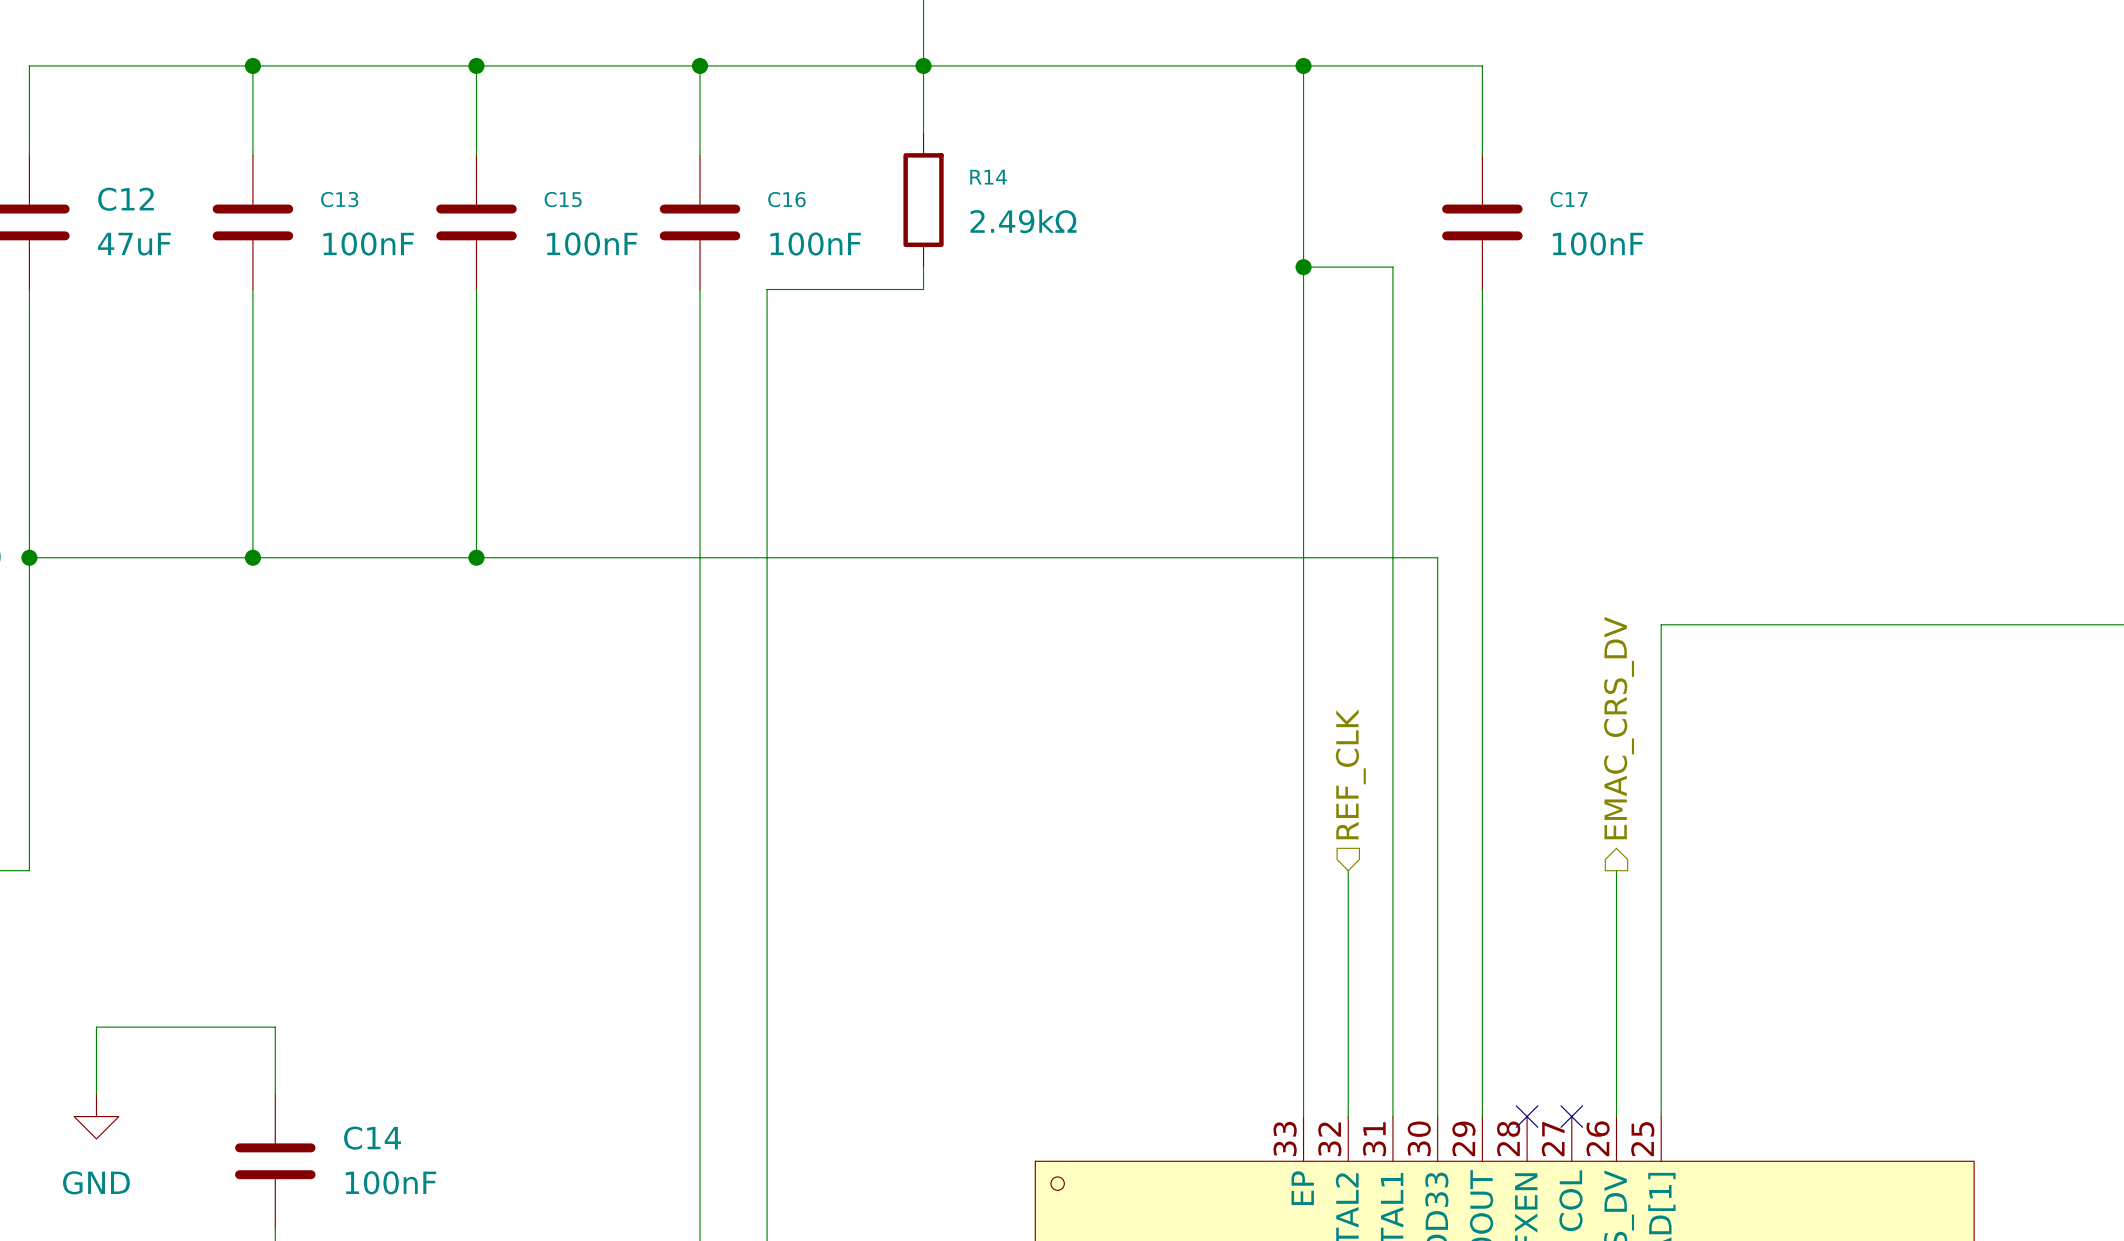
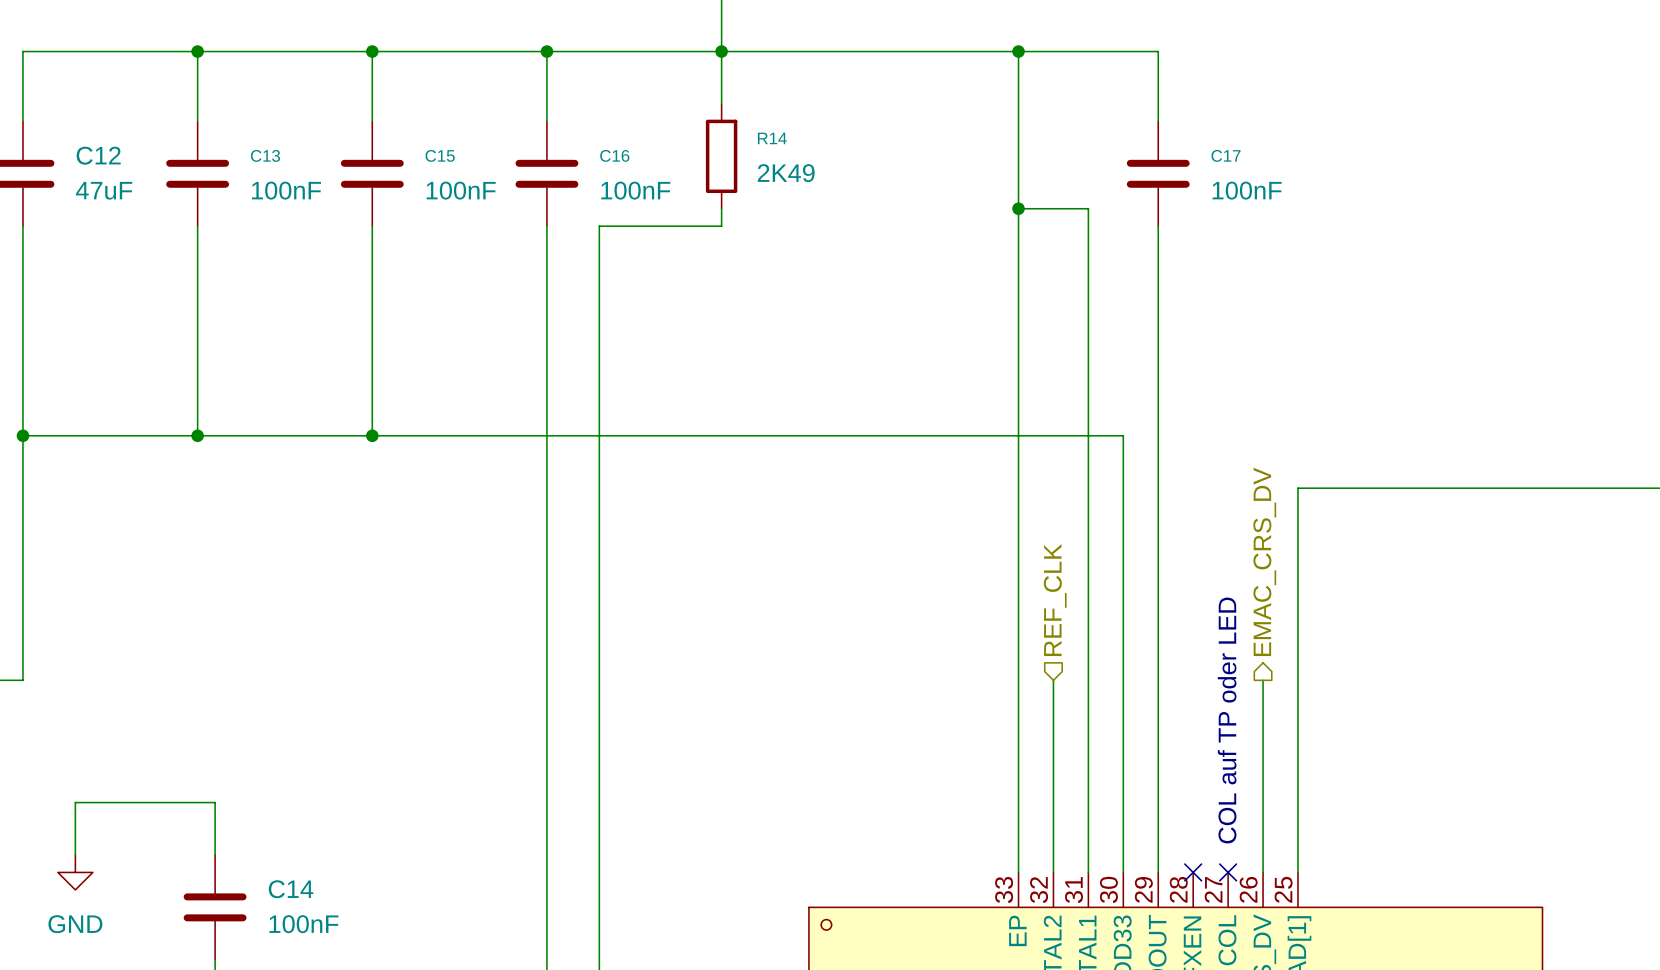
R14 value: 2.49kΩ (1023, 221) -> 2K49 (786, 173)
text: none -> COL auf TP oder LED (1227, 720)

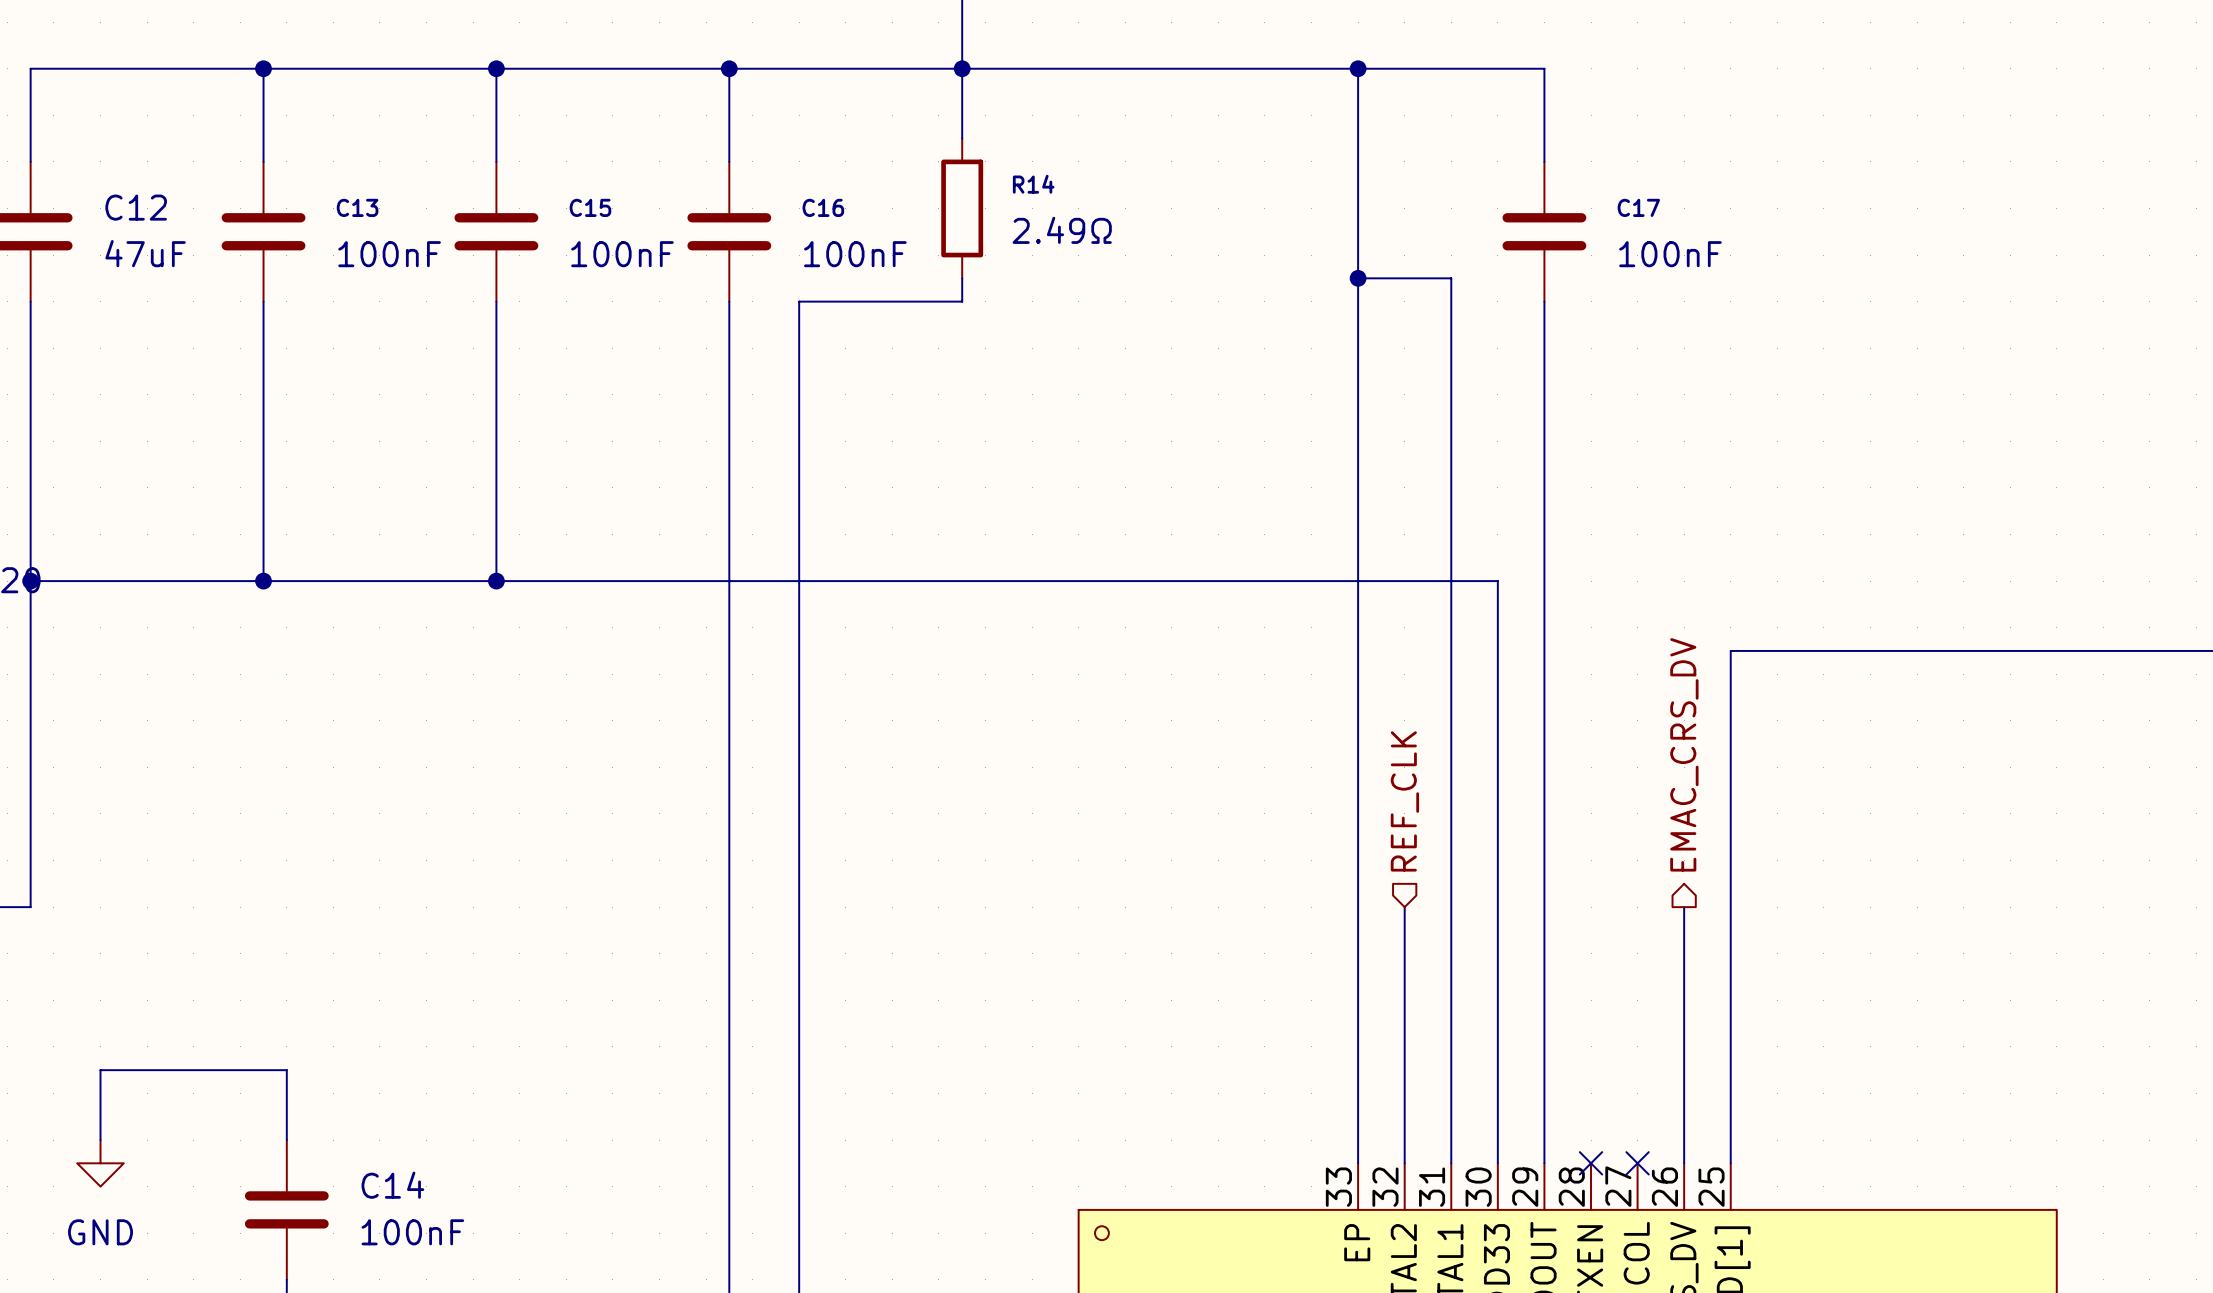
R14 value: 2K49 (786, 173) -> 2.49Ω (1062, 230)
text: COL auf TP oder LED (1227, 720) -> none

